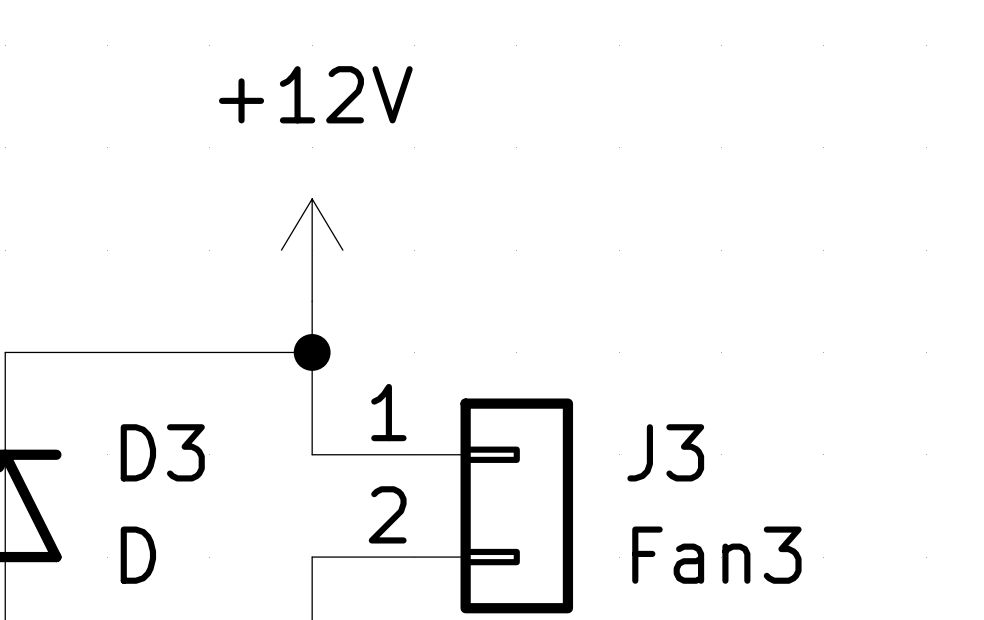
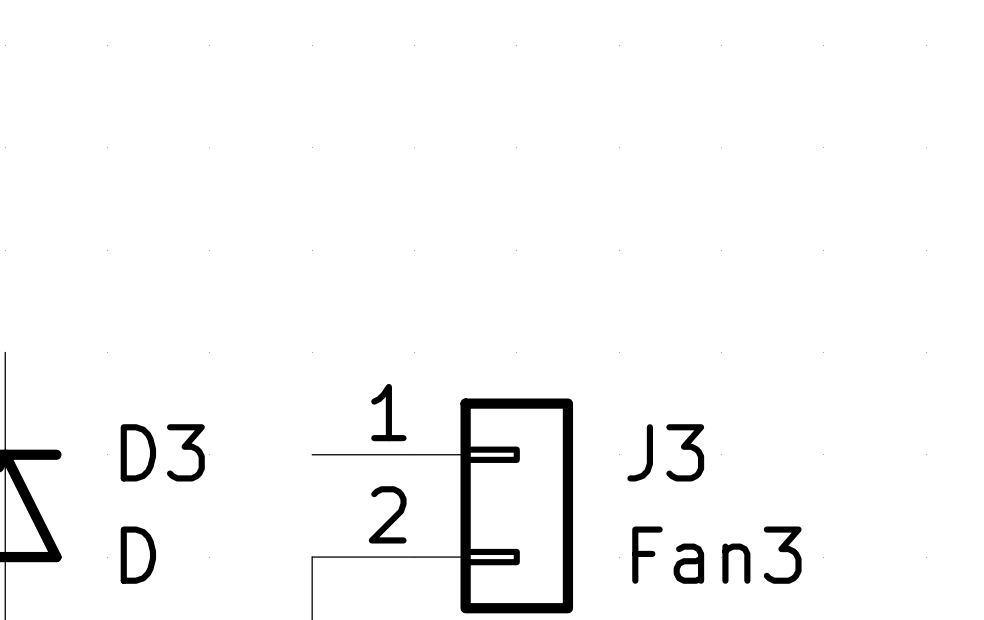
power symbol: +12V (312, 250) -> none
wire: (312, 301) (312, 454) -> none
wire: (5, 352) (312, 352) -> none
junction: (312, 352) -> none

